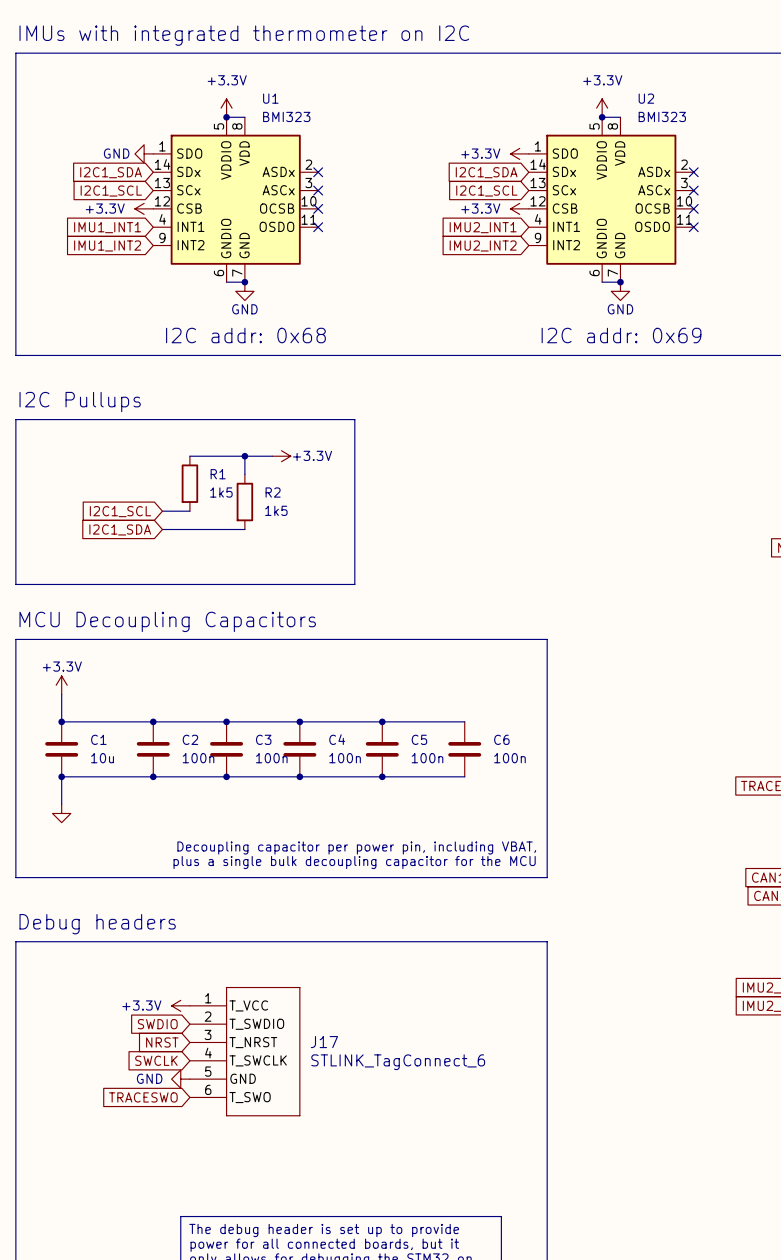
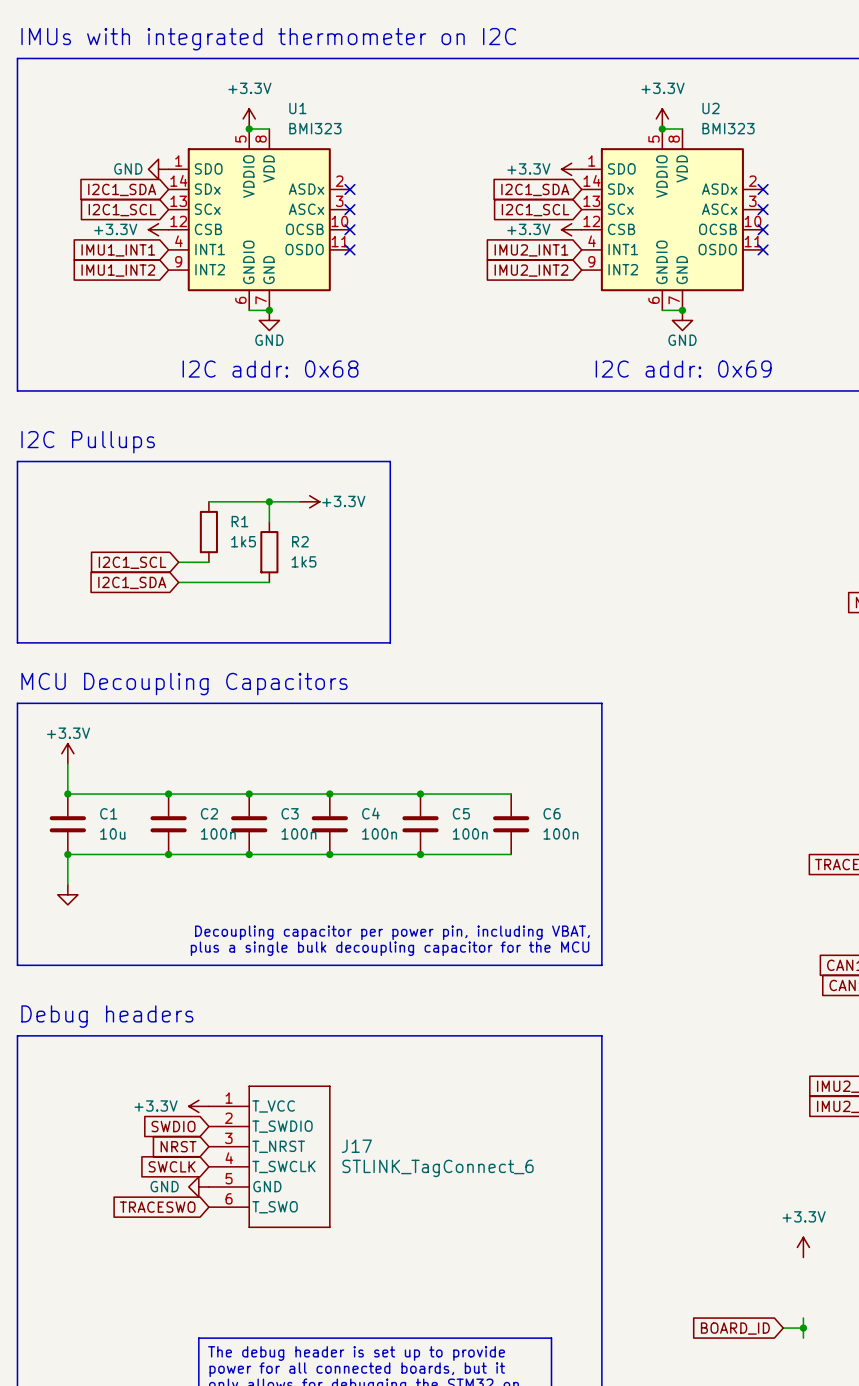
power symbol: none -> +3.3V (803, 1247)
wire: none -> (803, 1317) (803, 1338)
global label: none -> BOARD_ID (735, 1328)
wire: none -> (783, 1328) (803, 1328)
junction: none -> (803, 1328)

